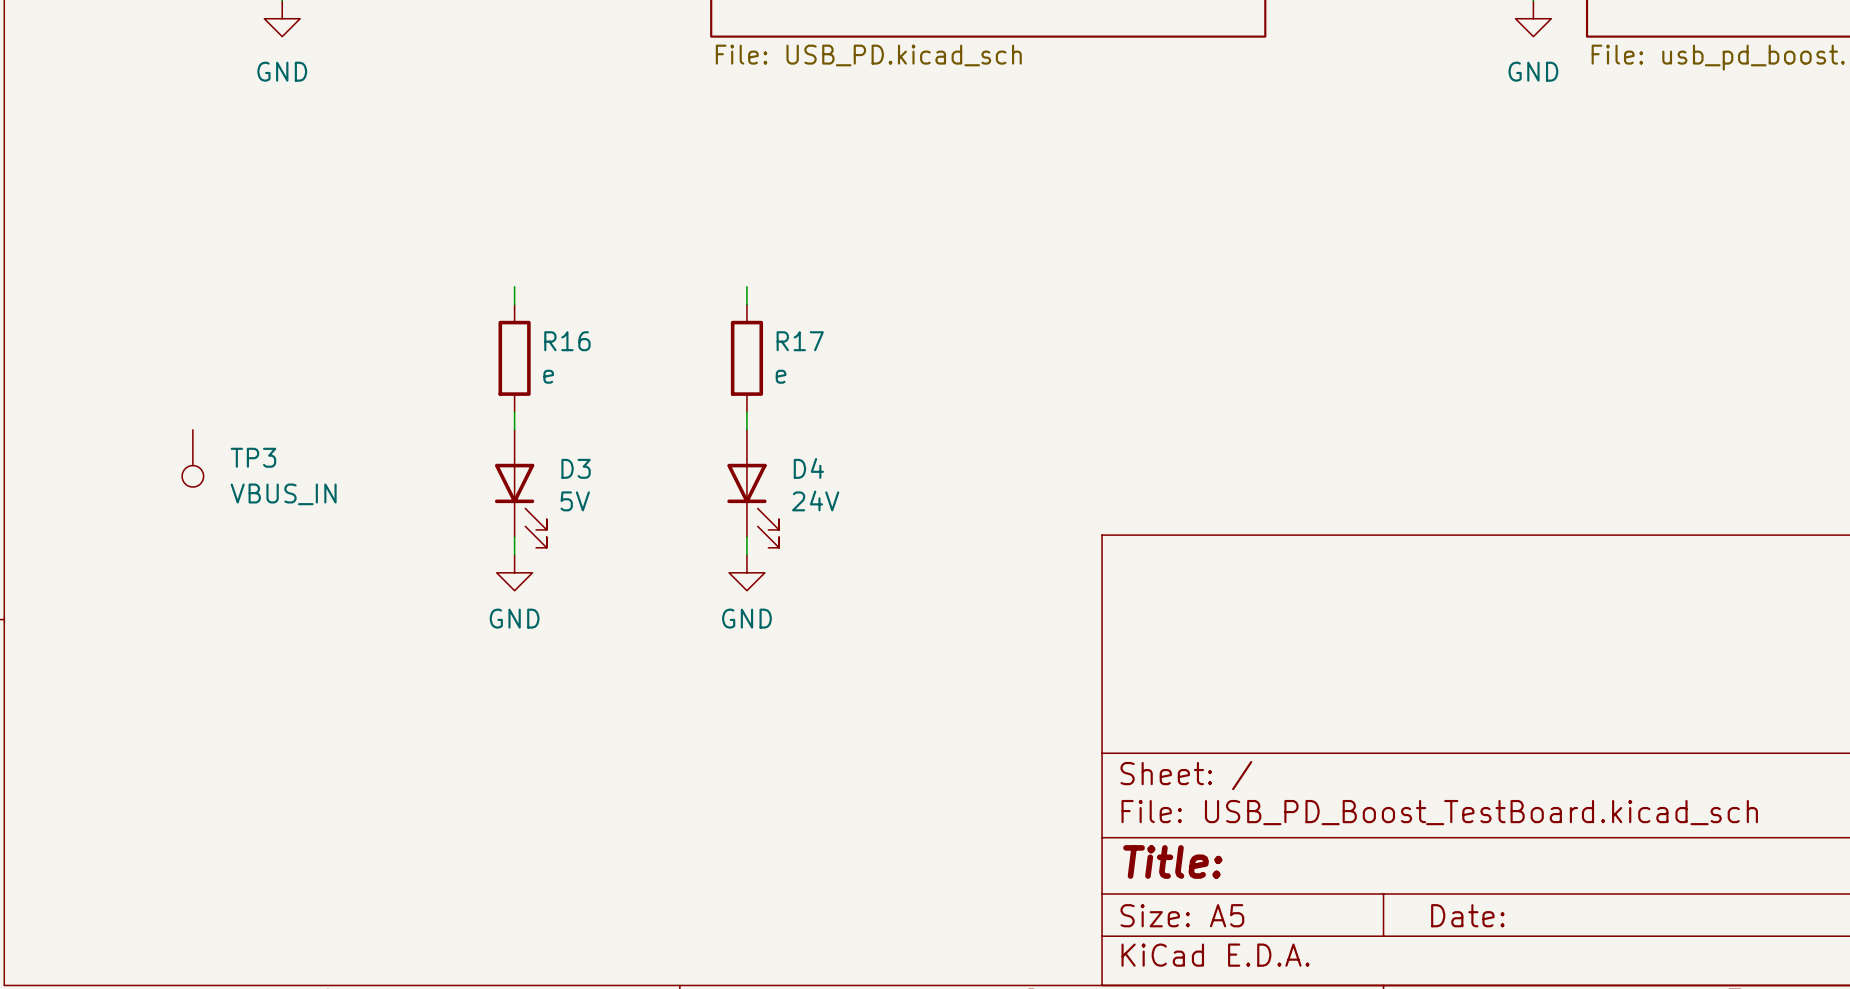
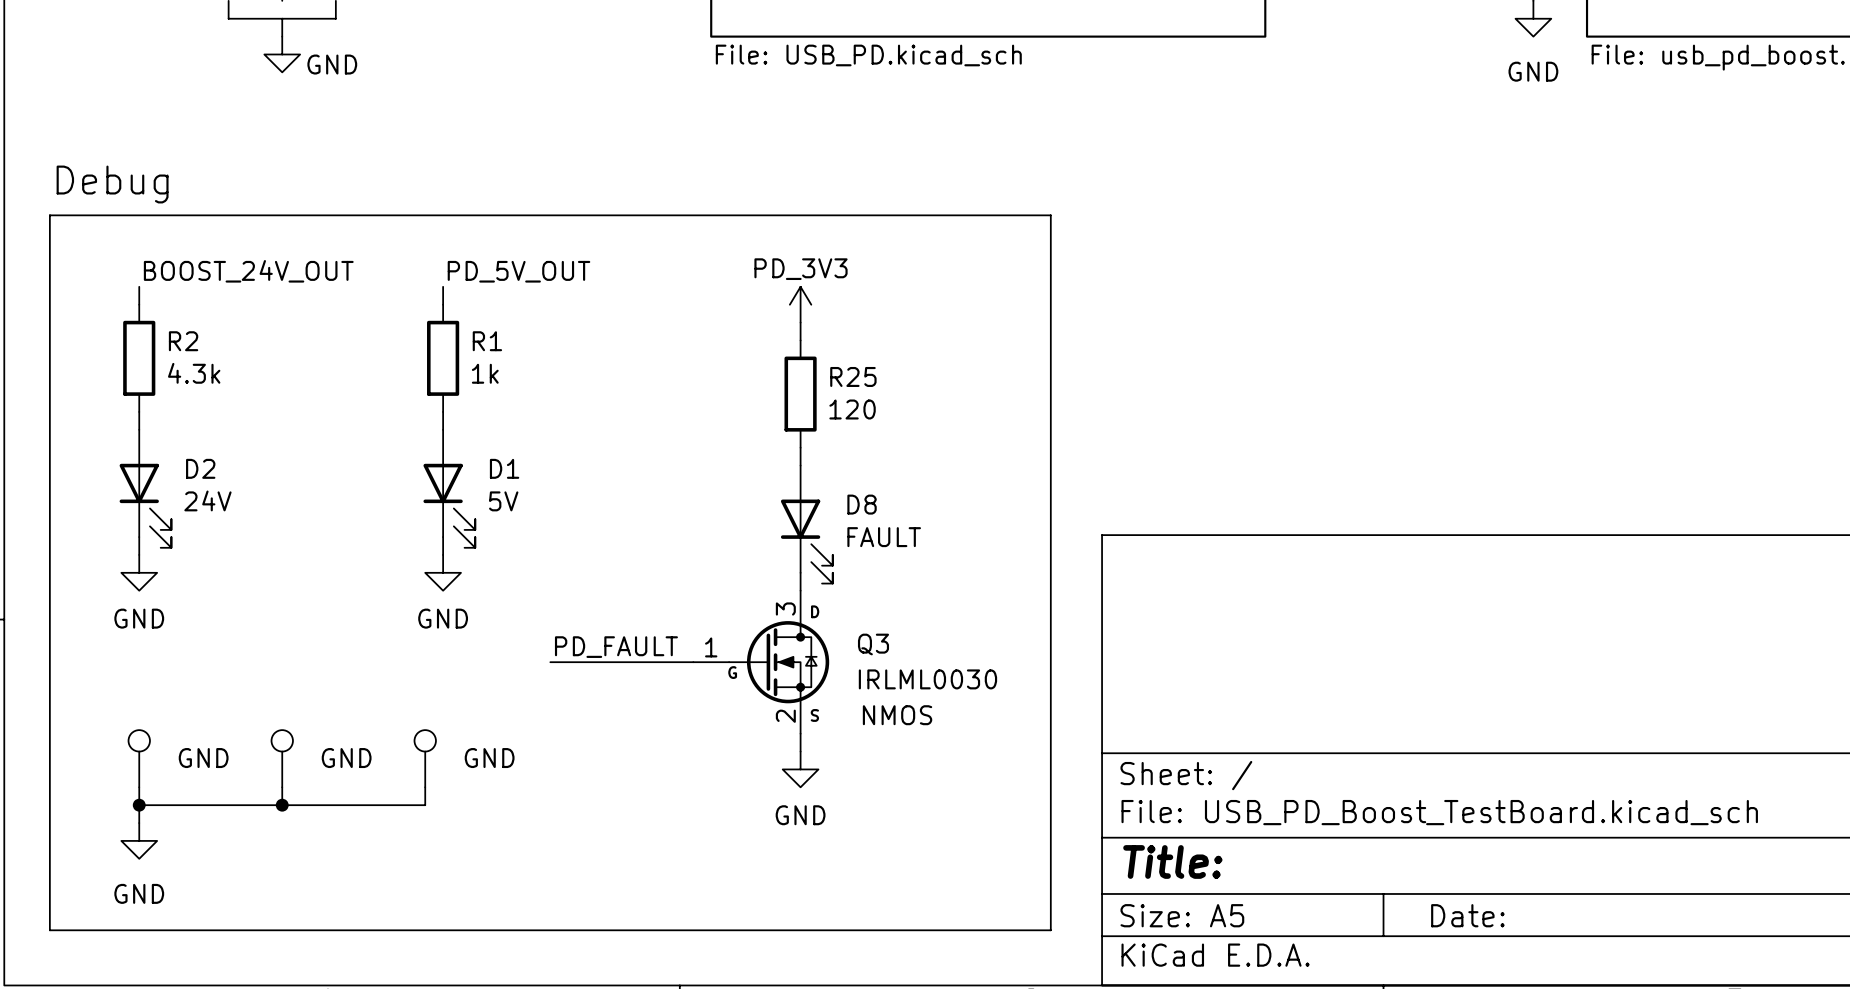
wire: none -> (228, 0) (228, 18) (335, 18) (335, 0)
wire: none -> (282, 18) (282, 36)
power symbol position: GND (282, 18) -> GND (282, 54)
power symbol text position: GND (282, 71) -> GND (332, 64)
text: none -> Debug (112, 184)
line: none -> (49, 215) (1050, 215) (1050, 930) (49, 930) (49, 215)
label: none -> BOOST_24V_OUT (248, 271)
label: none -> PD_5V_OUT (518, 271)
wire: none -> (139, 286) (139, 304)
wire: (514, 286) (514, 304) -> (443, 286) (443, 304)
wire: (746, 286) (746, 304) -> (800, 322) (800, 340)
power symbol: none -> PD_3V3 (800, 304)
R2: none -> 4.3k (139, 358)
R1: none -> 1k (443, 358)
R16: e (514, 358) -> none
R17: e (746, 358) -> none
R25: none -> 120 (800, 394)
wire: none -> (139, 411) (139, 429)
wire: (514, 411) (514, 429) -> (443, 411) (443, 429)
wire: (746, 411) (746, 429) -> (800, 447) (800, 465)
TP3: VBUS_IN (192, 458) -> none
D2: none -> 24V (145, 488)
D1: none -> 5V (449, 488)
D3: 5V (520, 488) -> none
D4: 24V (753, 488) -> none
D8: none -> FAULT (806, 524)
wire: none -> (139, 537) (139, 554)
wire: (514, 537) (514, 554) -> (443, 537) (443, 554)
wire: (746, 537) (746, 554) -> (800, 572) (800, 590)
power symbol: none -> GND (139, 572)
power symbol position: GND (514, 572) -> GND (443, 572)
power symbol: GND (746, 572) -> none
text: none -> D (815, 611)
label: none -> PD_FAULT (616, 647)
wire: none -> (550, 662) (693, 662)
Q3: none -> IRLML0030 (761, 662)
text: none -> G (732, 672)
text: none -> S (814, 715)
text: none -> NMOS (897, 715)
wire: none -> (800, 733) (800, 751)
part: none -> GND (139, 758)
part: none -> GND (282, 758)
part: none -> GND (425, 758)
power symbol: none -> GND (800, 769)
wire: none -> (139, 787) (139, 823)
wire: none -> (282, 787) (282, 805)
wire: none -> (425, 787) (425, 805) (139, 805)
junction: none -> (139, 805)
junction: none -> (282, 805)
power symbol: none -> GND (139, 840)

